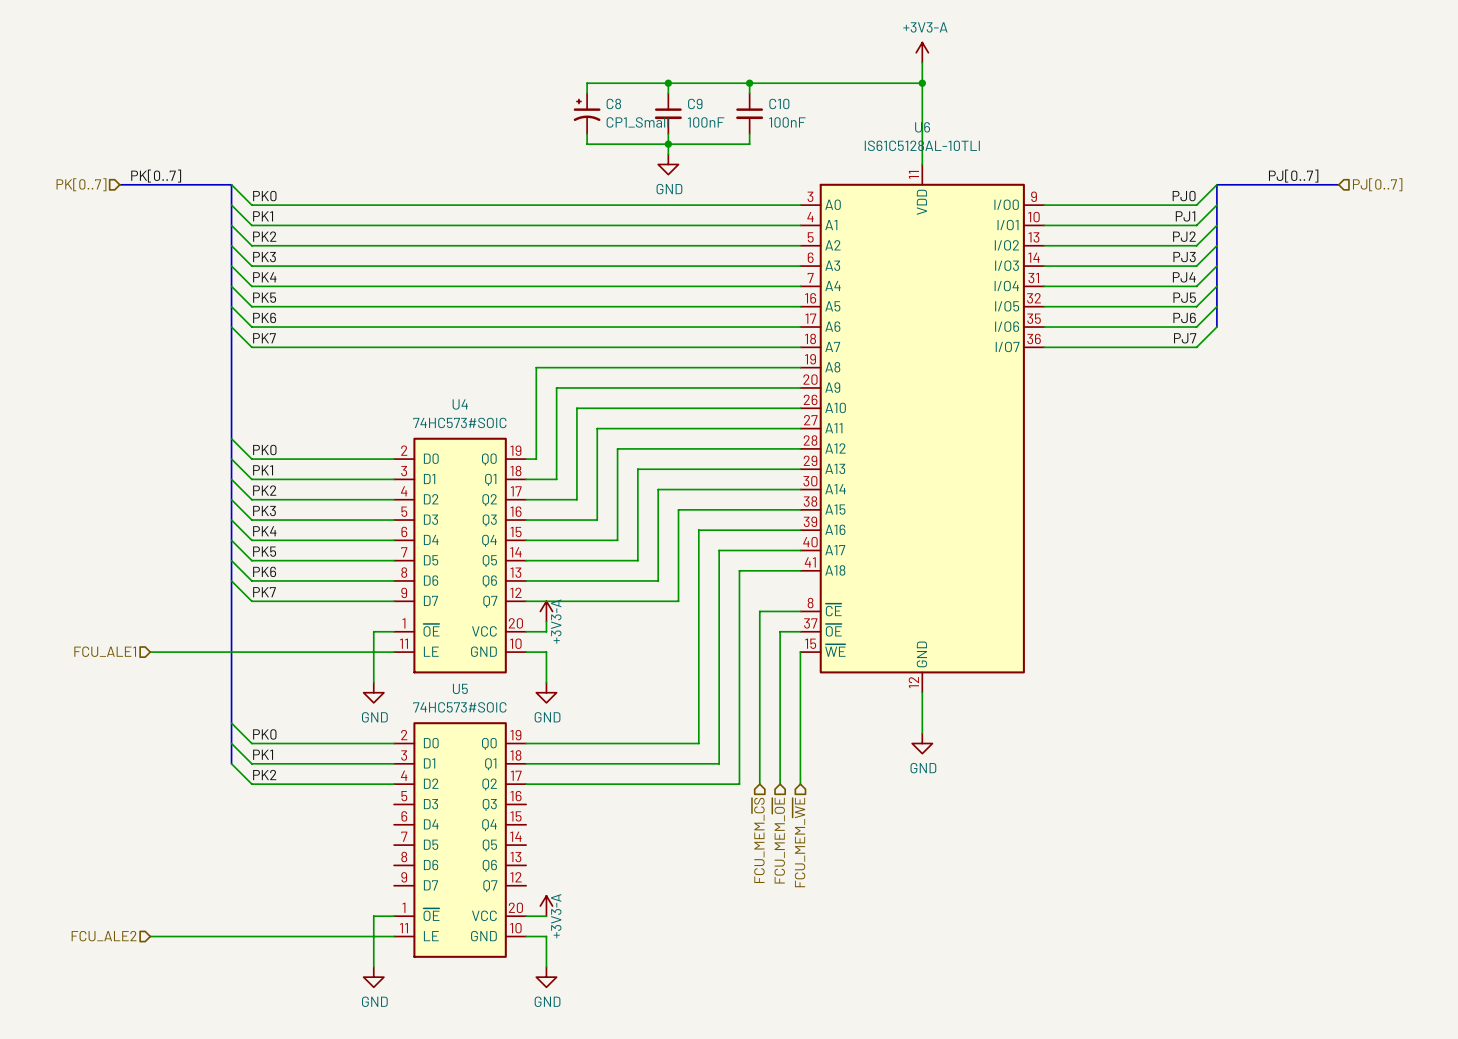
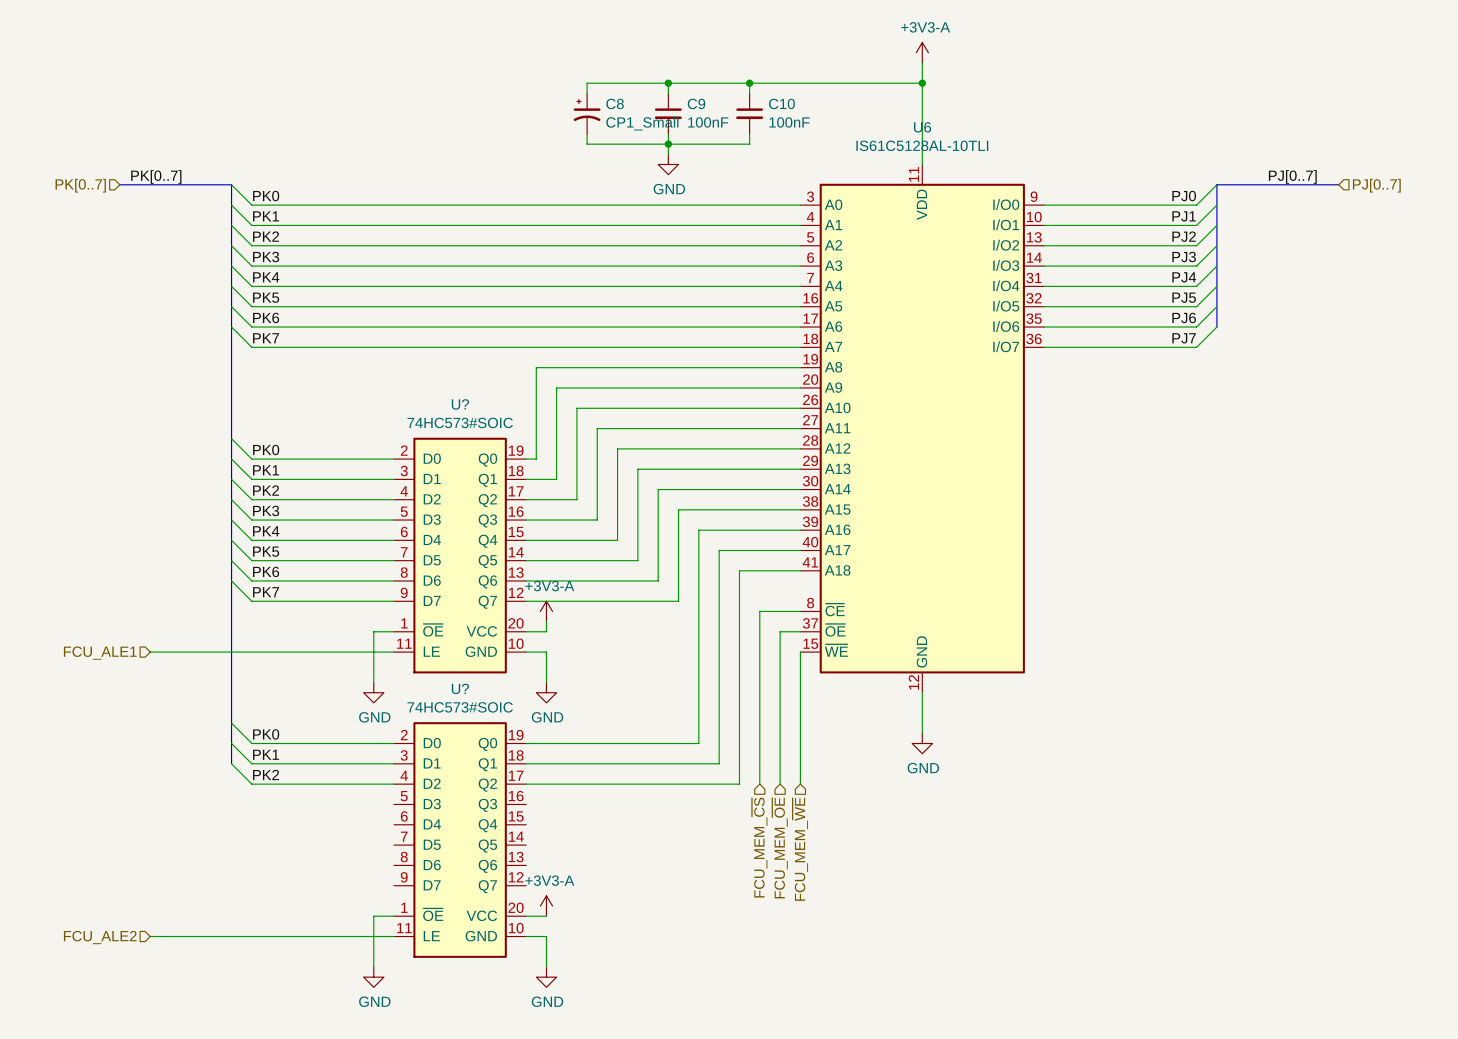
U4 name: U4 (460, 404) -> U? (460, 404)
power symbol text rotation: 0° (556, 621) -> 90° clockwise (549, 586)
U5 name: U5 (460, 688) -> U? (460, 688)
power symbol text rotation: 0° (556, 916) -> 90° clockwise (549, 880)

